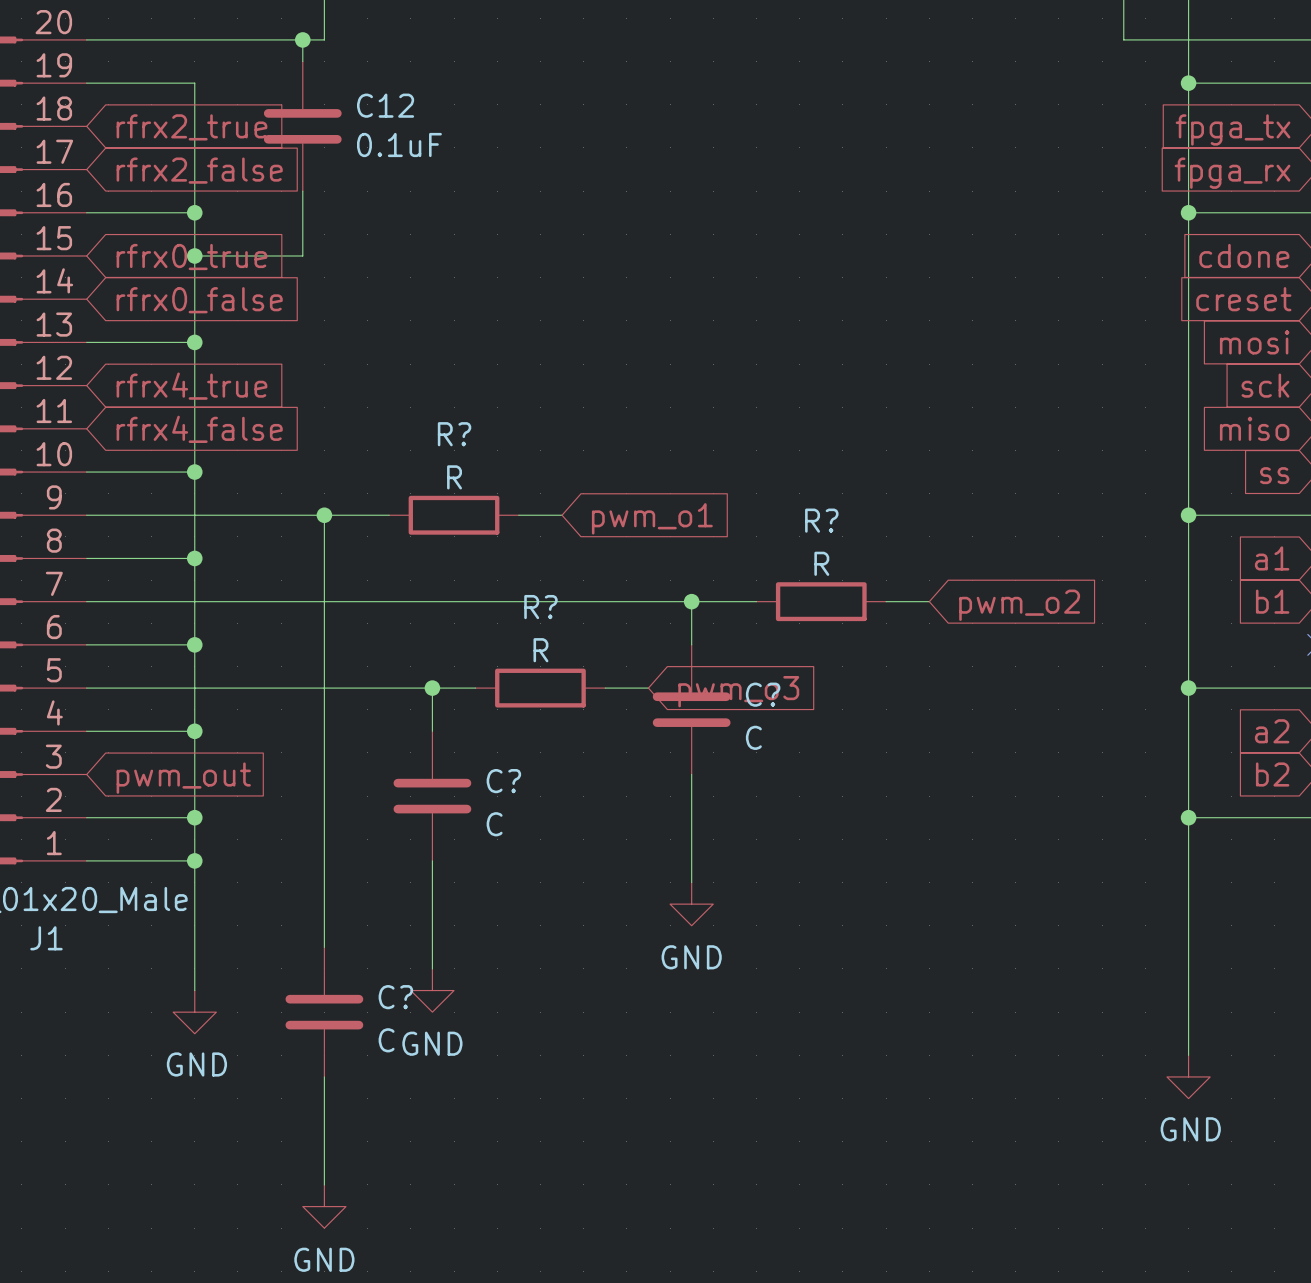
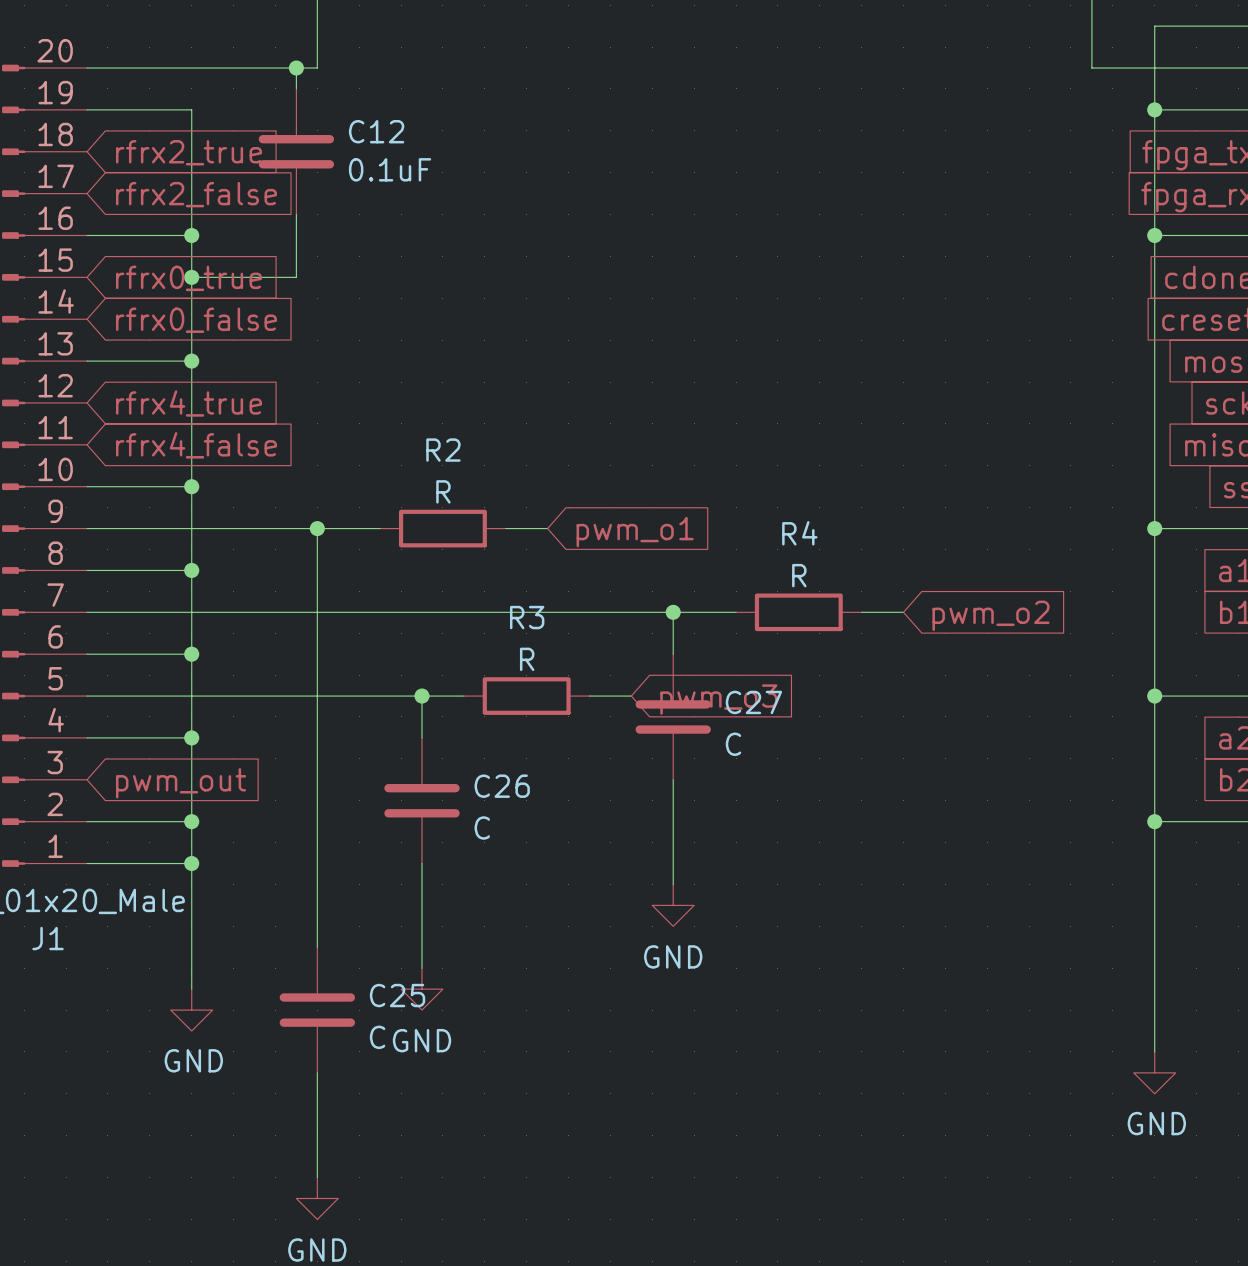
R? name: R? (454, 434) -> R2 (443, 450)
R? name: R? (821, 520) -> R4 (799, 533)
R? name: R? (540, 607) -> R3 (527, 617)
C? name: C? (763, 694) -> C27 (753, 702)
C? name: C? (503, 781) -> C26 (502, 786)
C? name: C? (395, 997) -> C25 (397, 995)

